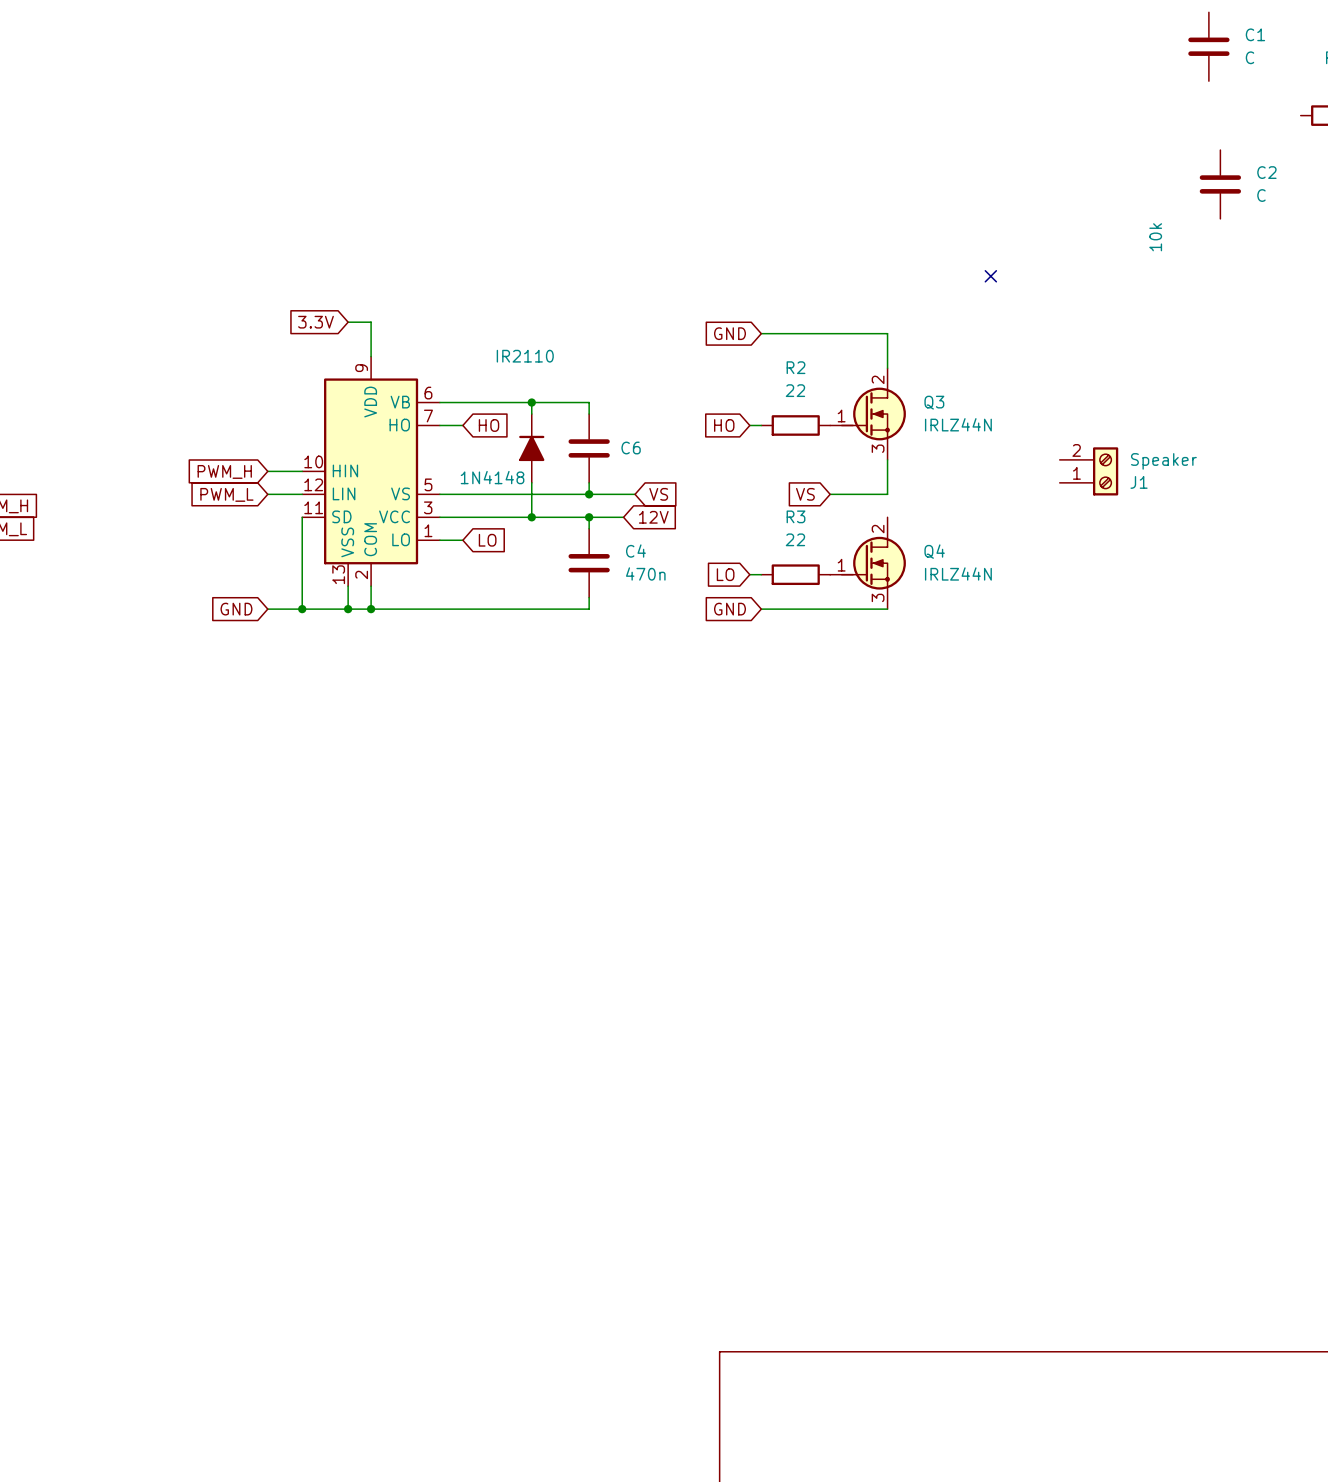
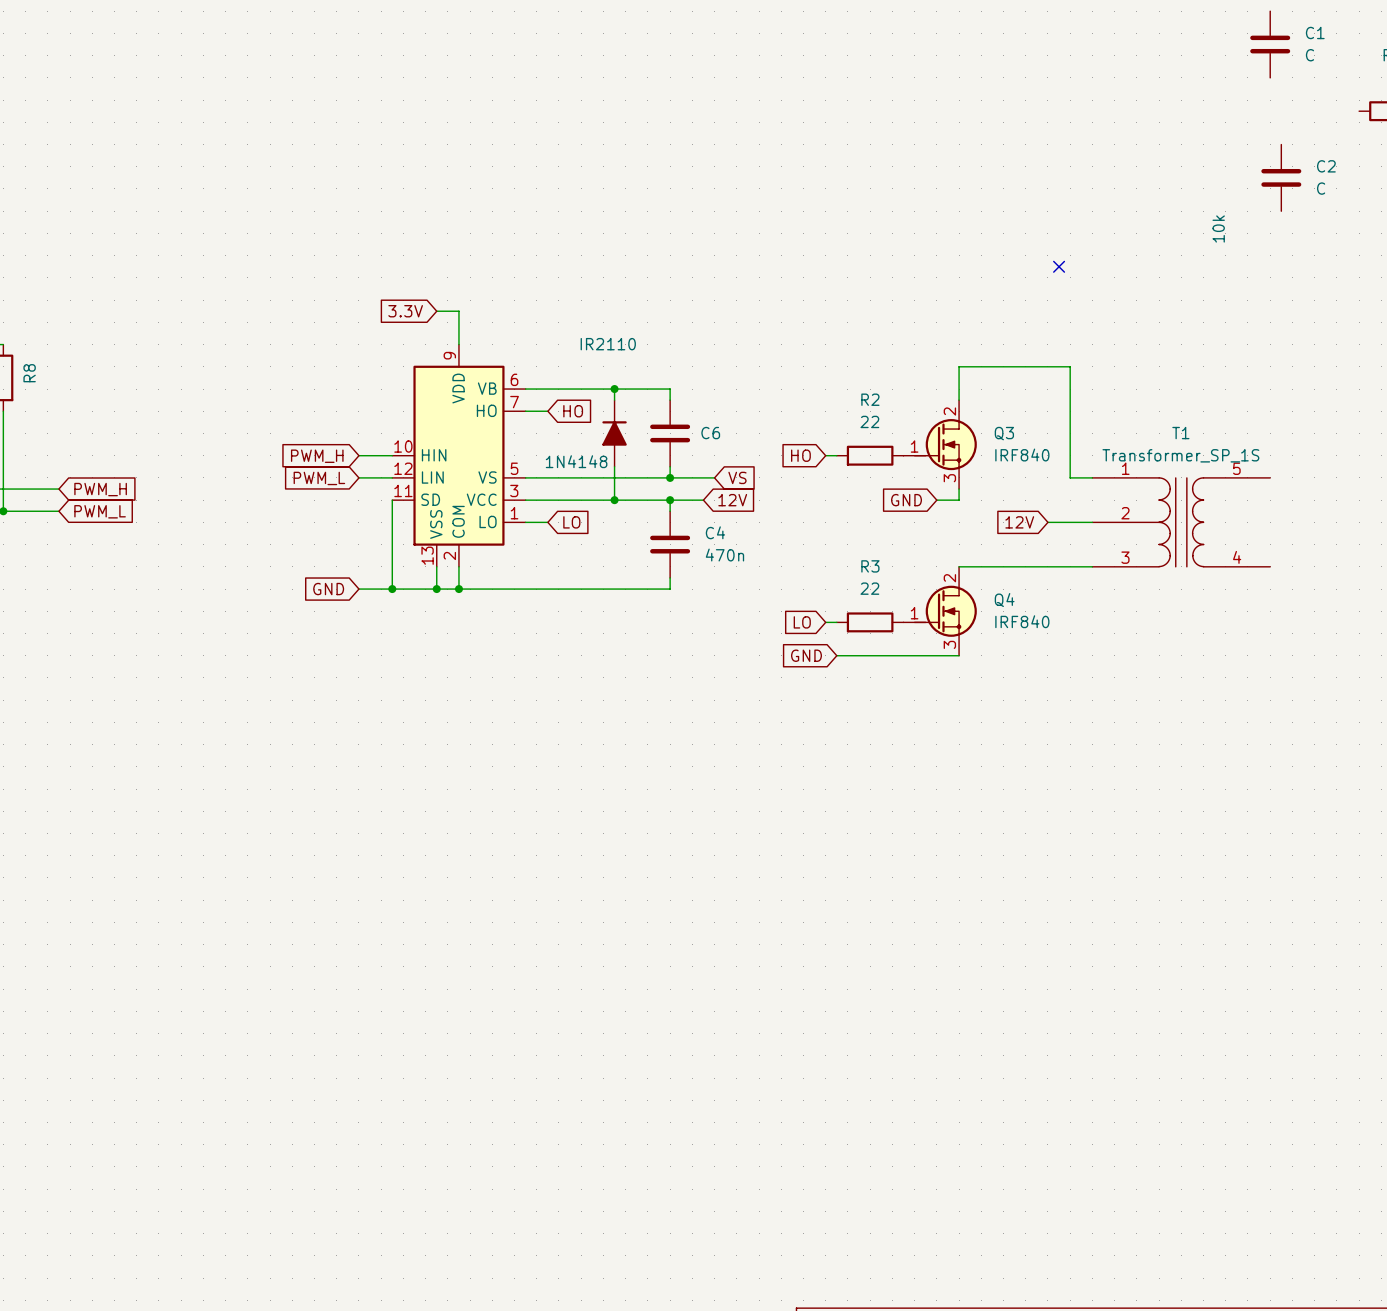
global label: GND (729, 333) -> none
wire: (761, 333) (887, 333) (887, 368) -> none
Q3 position: (868, 414) -> (940, 444)
wire: none -> (959, 400) (959, 366) (1070, 366) (1070, 477) (1092, 477)
Q3 value: IRLZ44N (958, 424) -> IRF840 (1022, 455)
global label position: HO (724, 425) -> HO (800, 455)
wire: (749, 425) (761, 425) -> (825, 455) (836, 455)
R2 position: (795, 425) -> (870, 455)
wire: (887, 459) (887, 494) (830, 494) -> none
J1: Speaker (1088, 471) -> none
global label: VS (805, 494) -> none
wire: none -> (959, 489) (959, 500) (936, 500)
global label: none -> GND (906, 500)
global label: none -> 12V (1019, 522)
wire: none -> (1047, 522) (1092, 522)
T1: none -> Transformer_SP_1S (1181, 522)
Q4 position: (868, 563) -> (940, 611)
Q4 value: IRLZ44N (958, 573) -> IRF840 (1022, 621)
global label position: LO (725, 574) -> LO (802, 622)
wire: (749, 574) (761, 574) -> (825, 622) (836, 622)
R3 position: (795, 574) -> (870, 622)
wire: none -> (959, 566) (1092, 566)
global label position: GND (729, 609) -> GND (806, 655)
wire: (761, 609) (887, 609) -> (836, 655) (959, 655)

